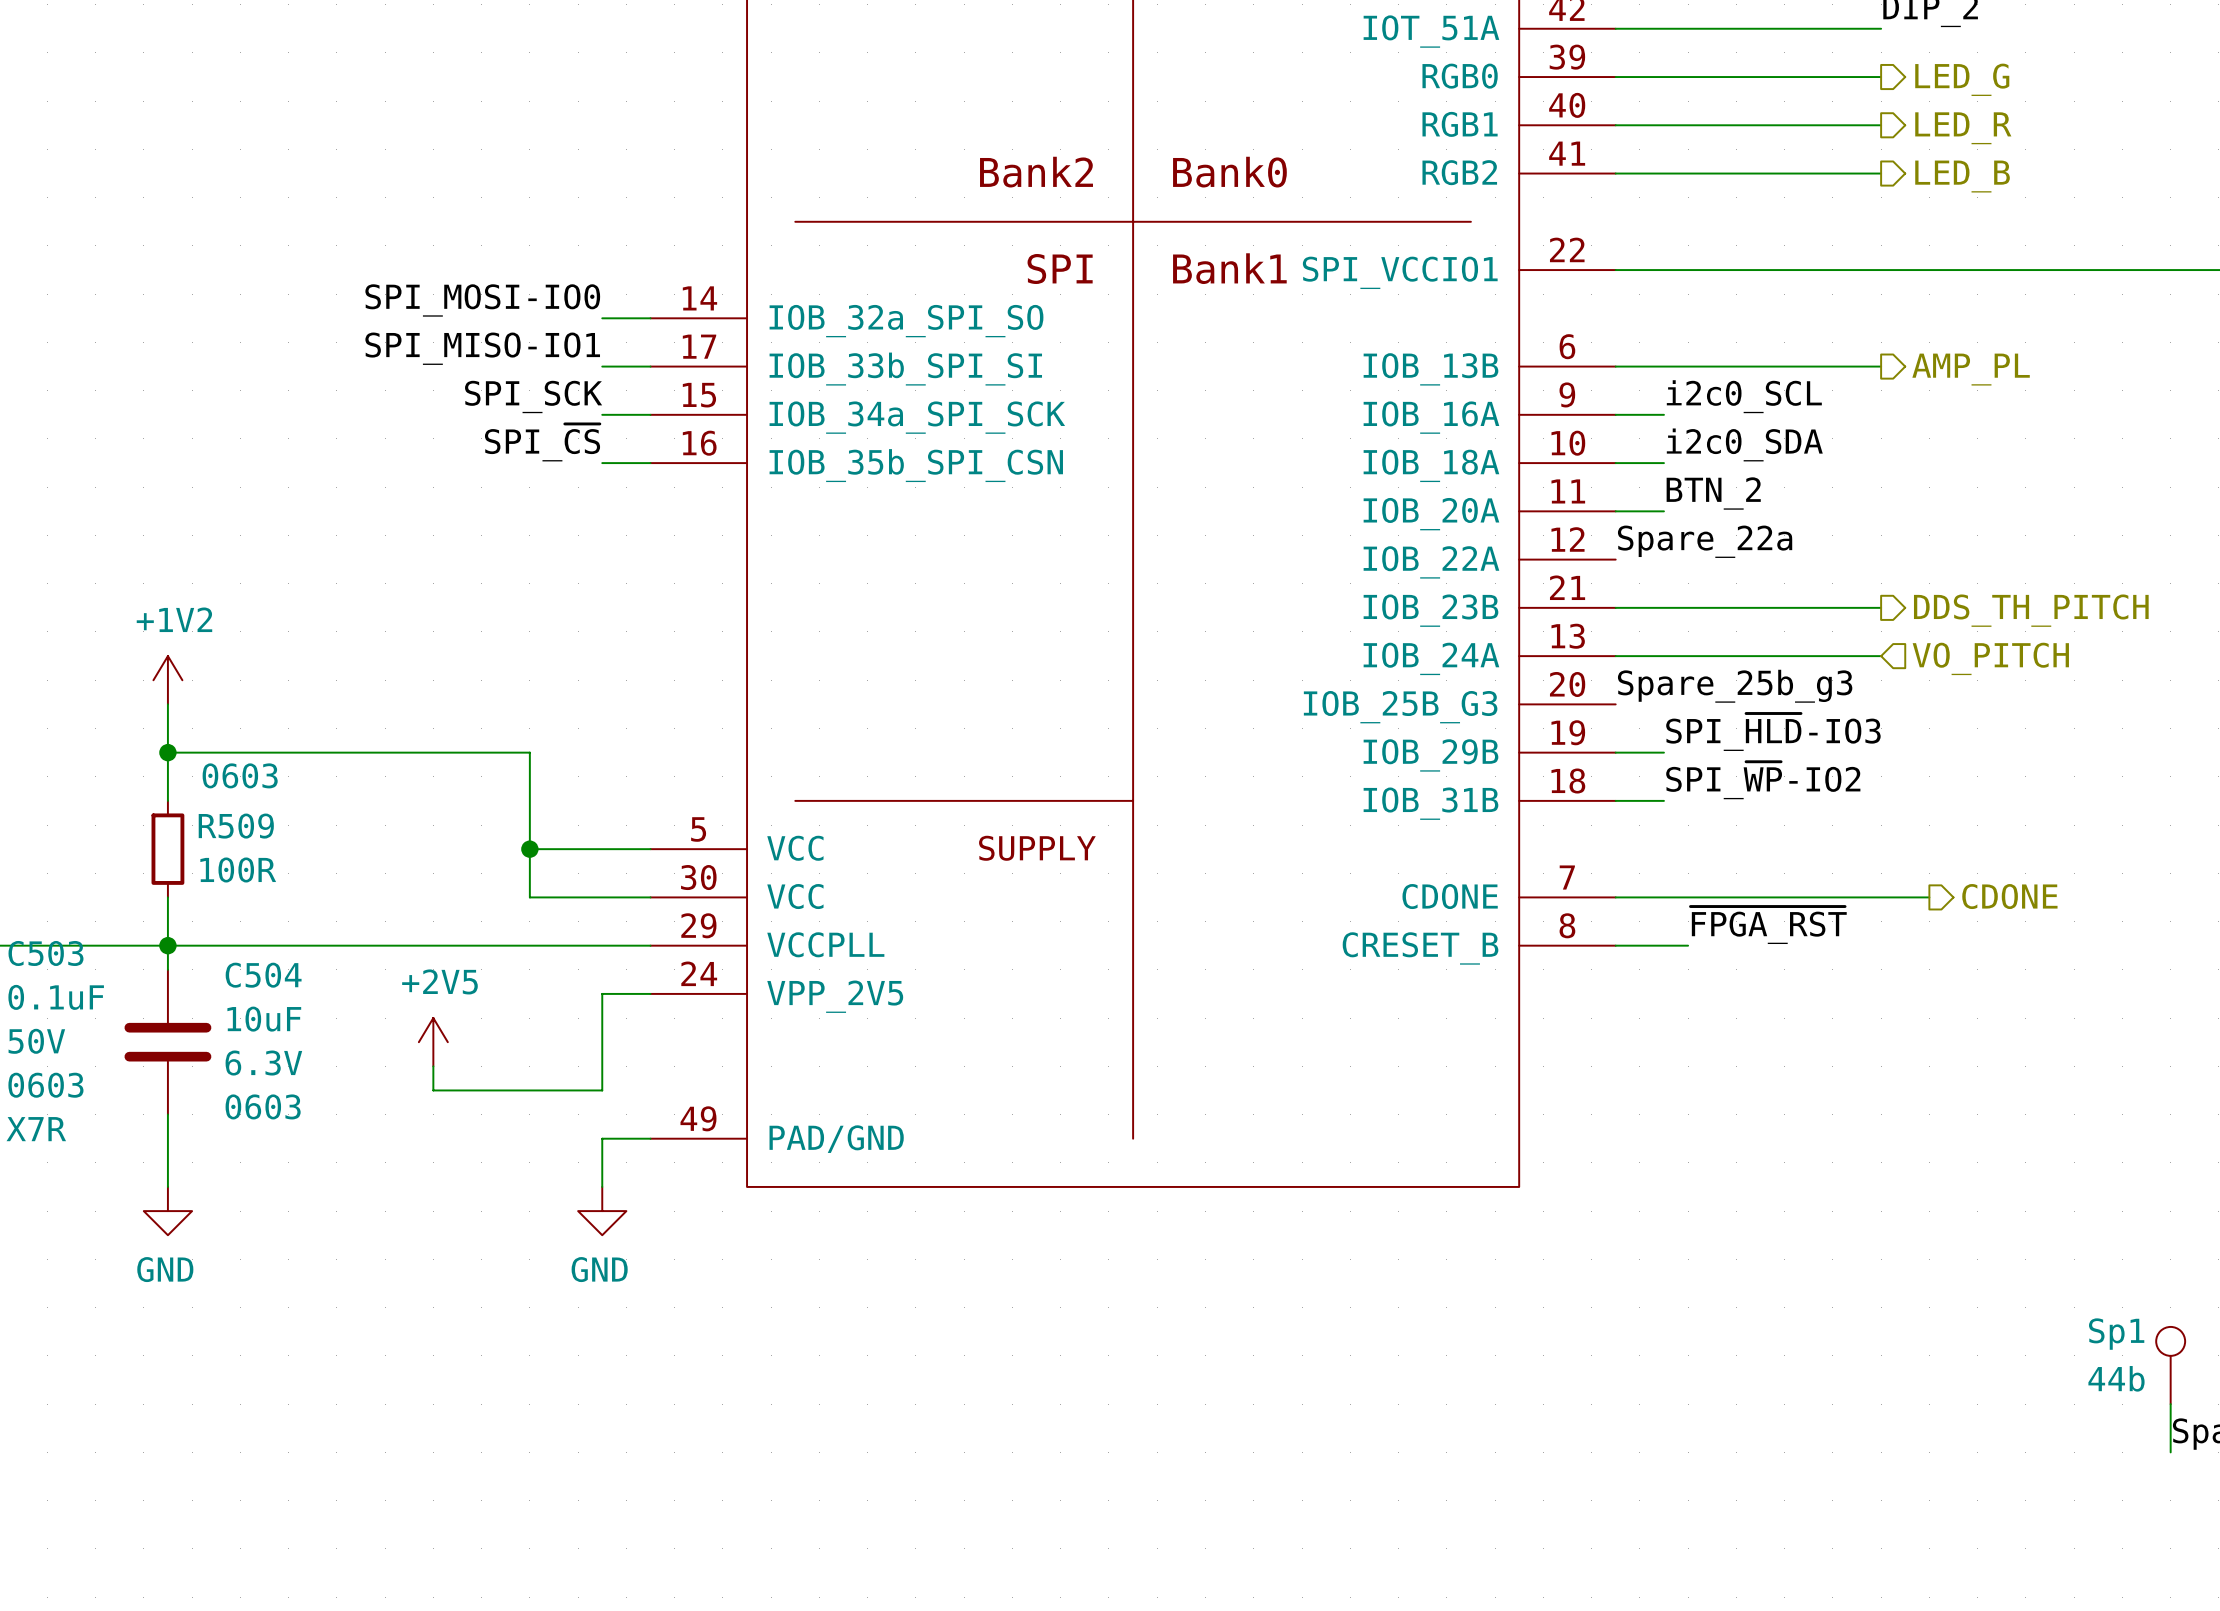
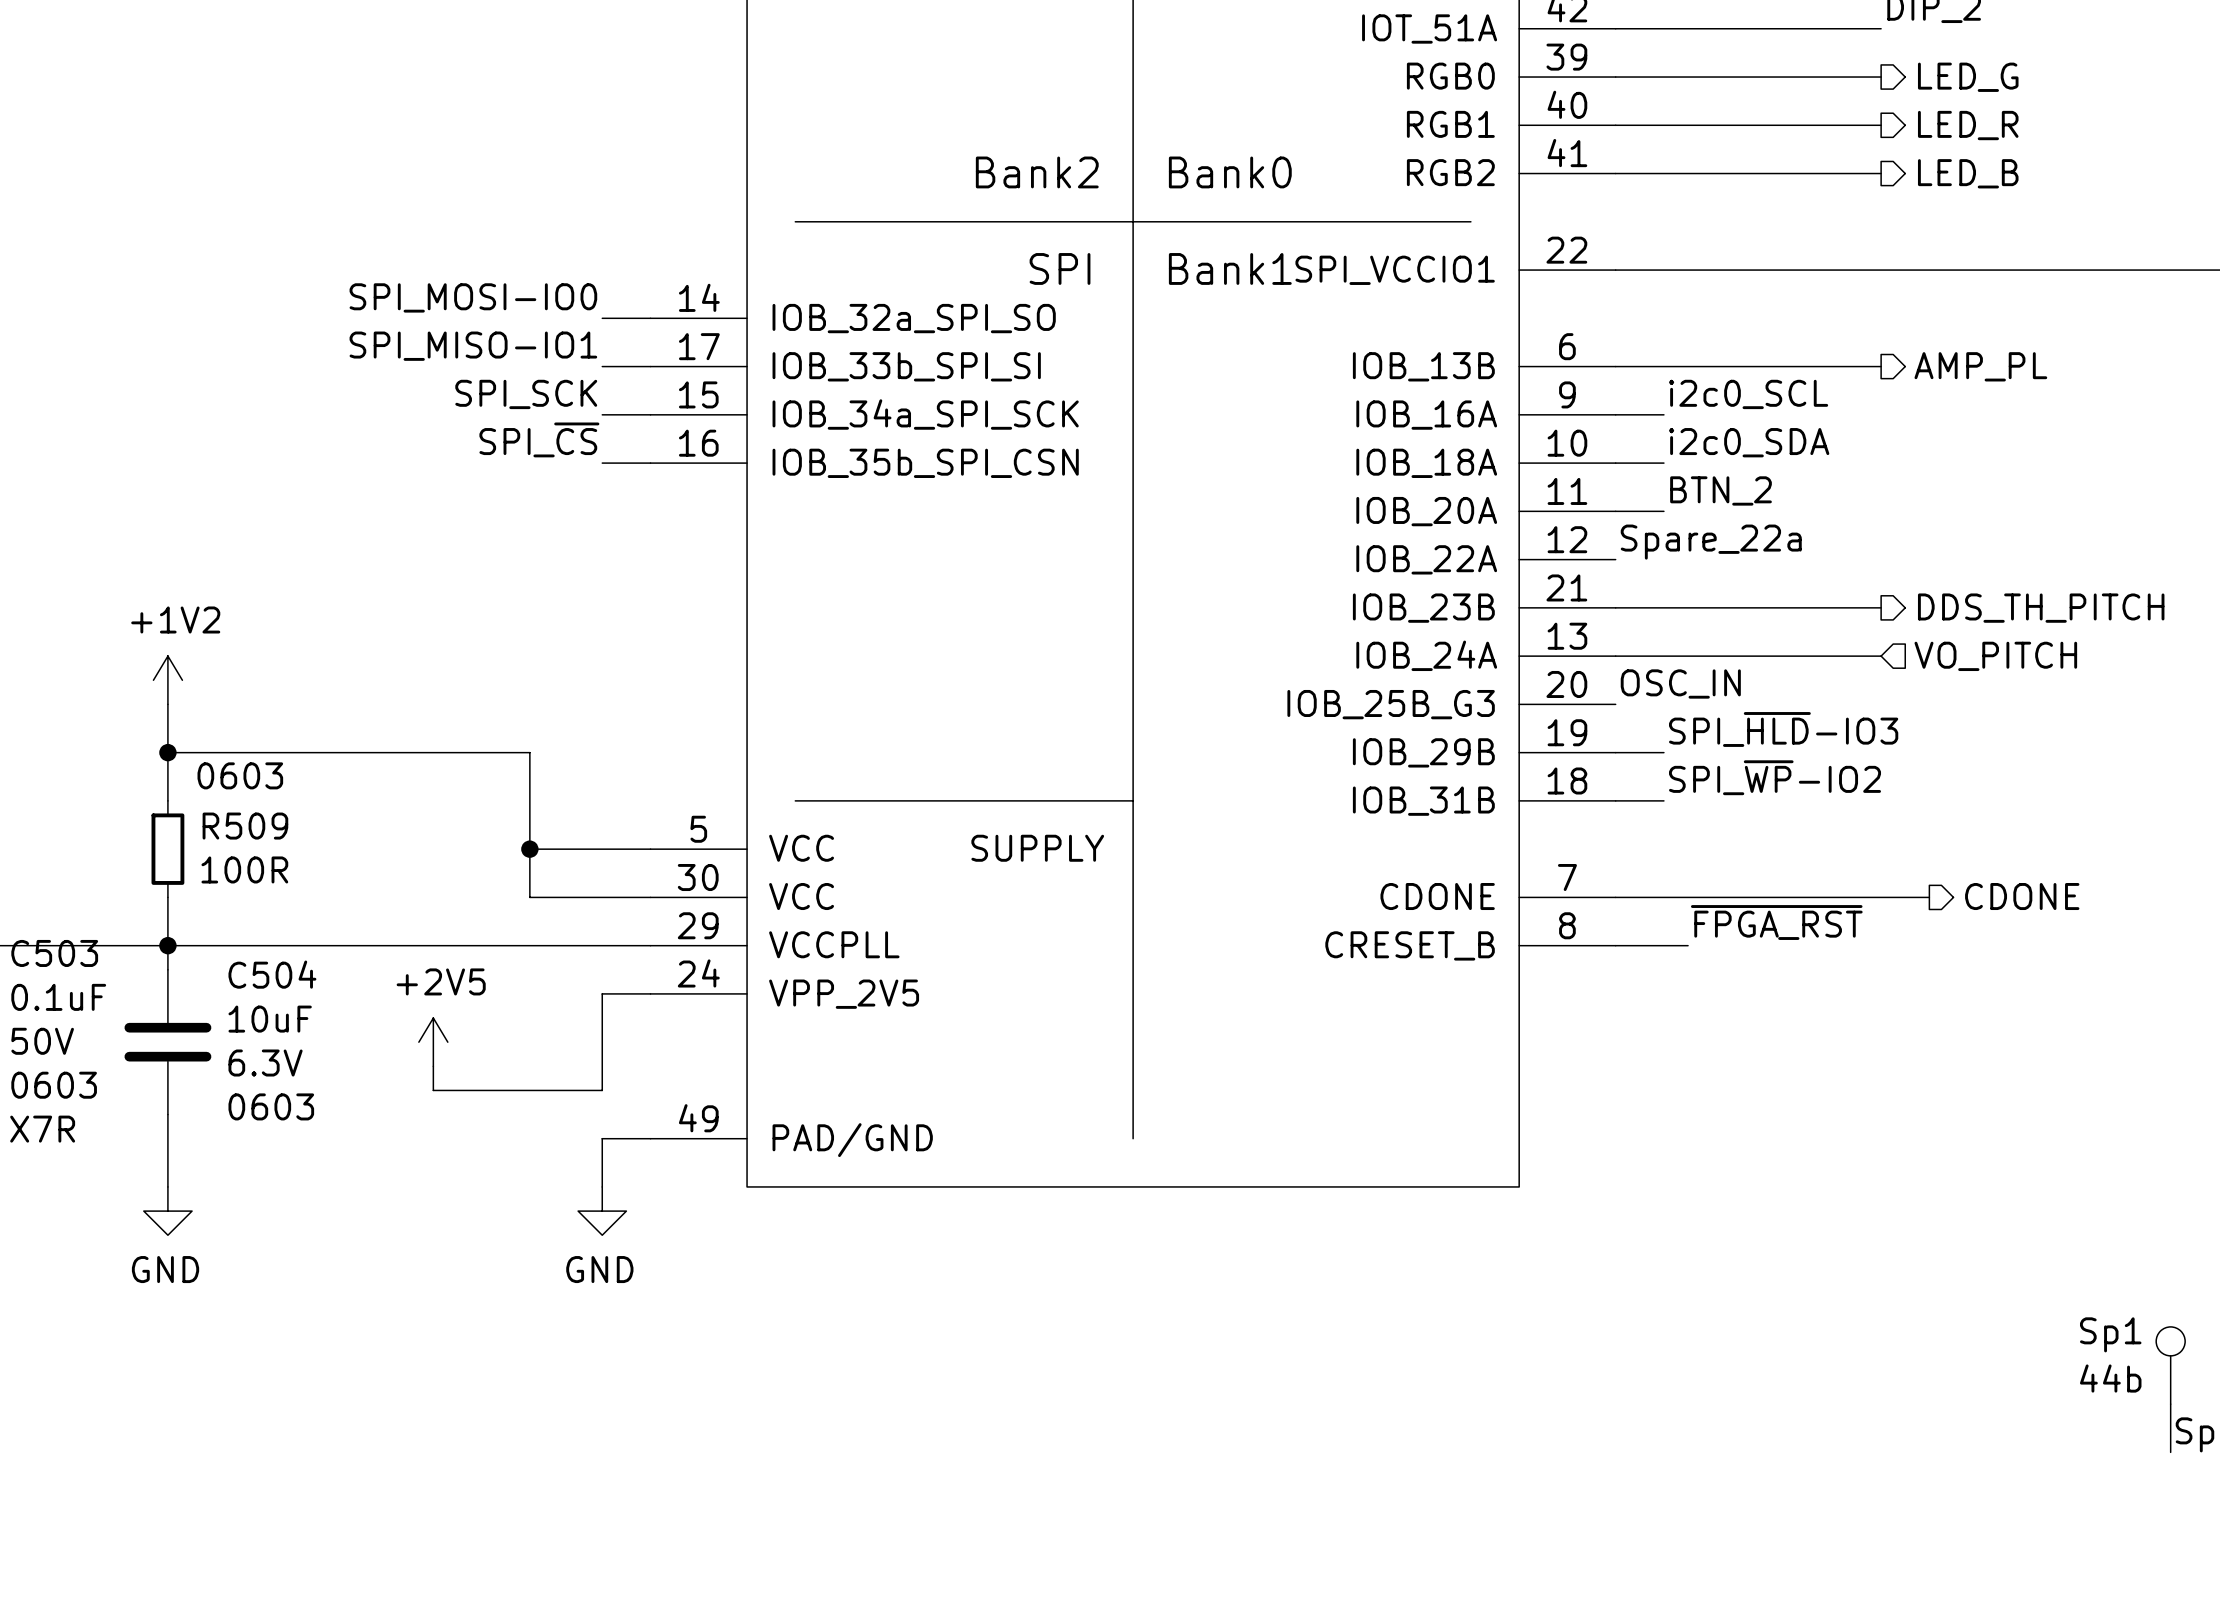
label: Spare_25b_g3 (1735, 686) -> OSC_IN (1680, 684)

